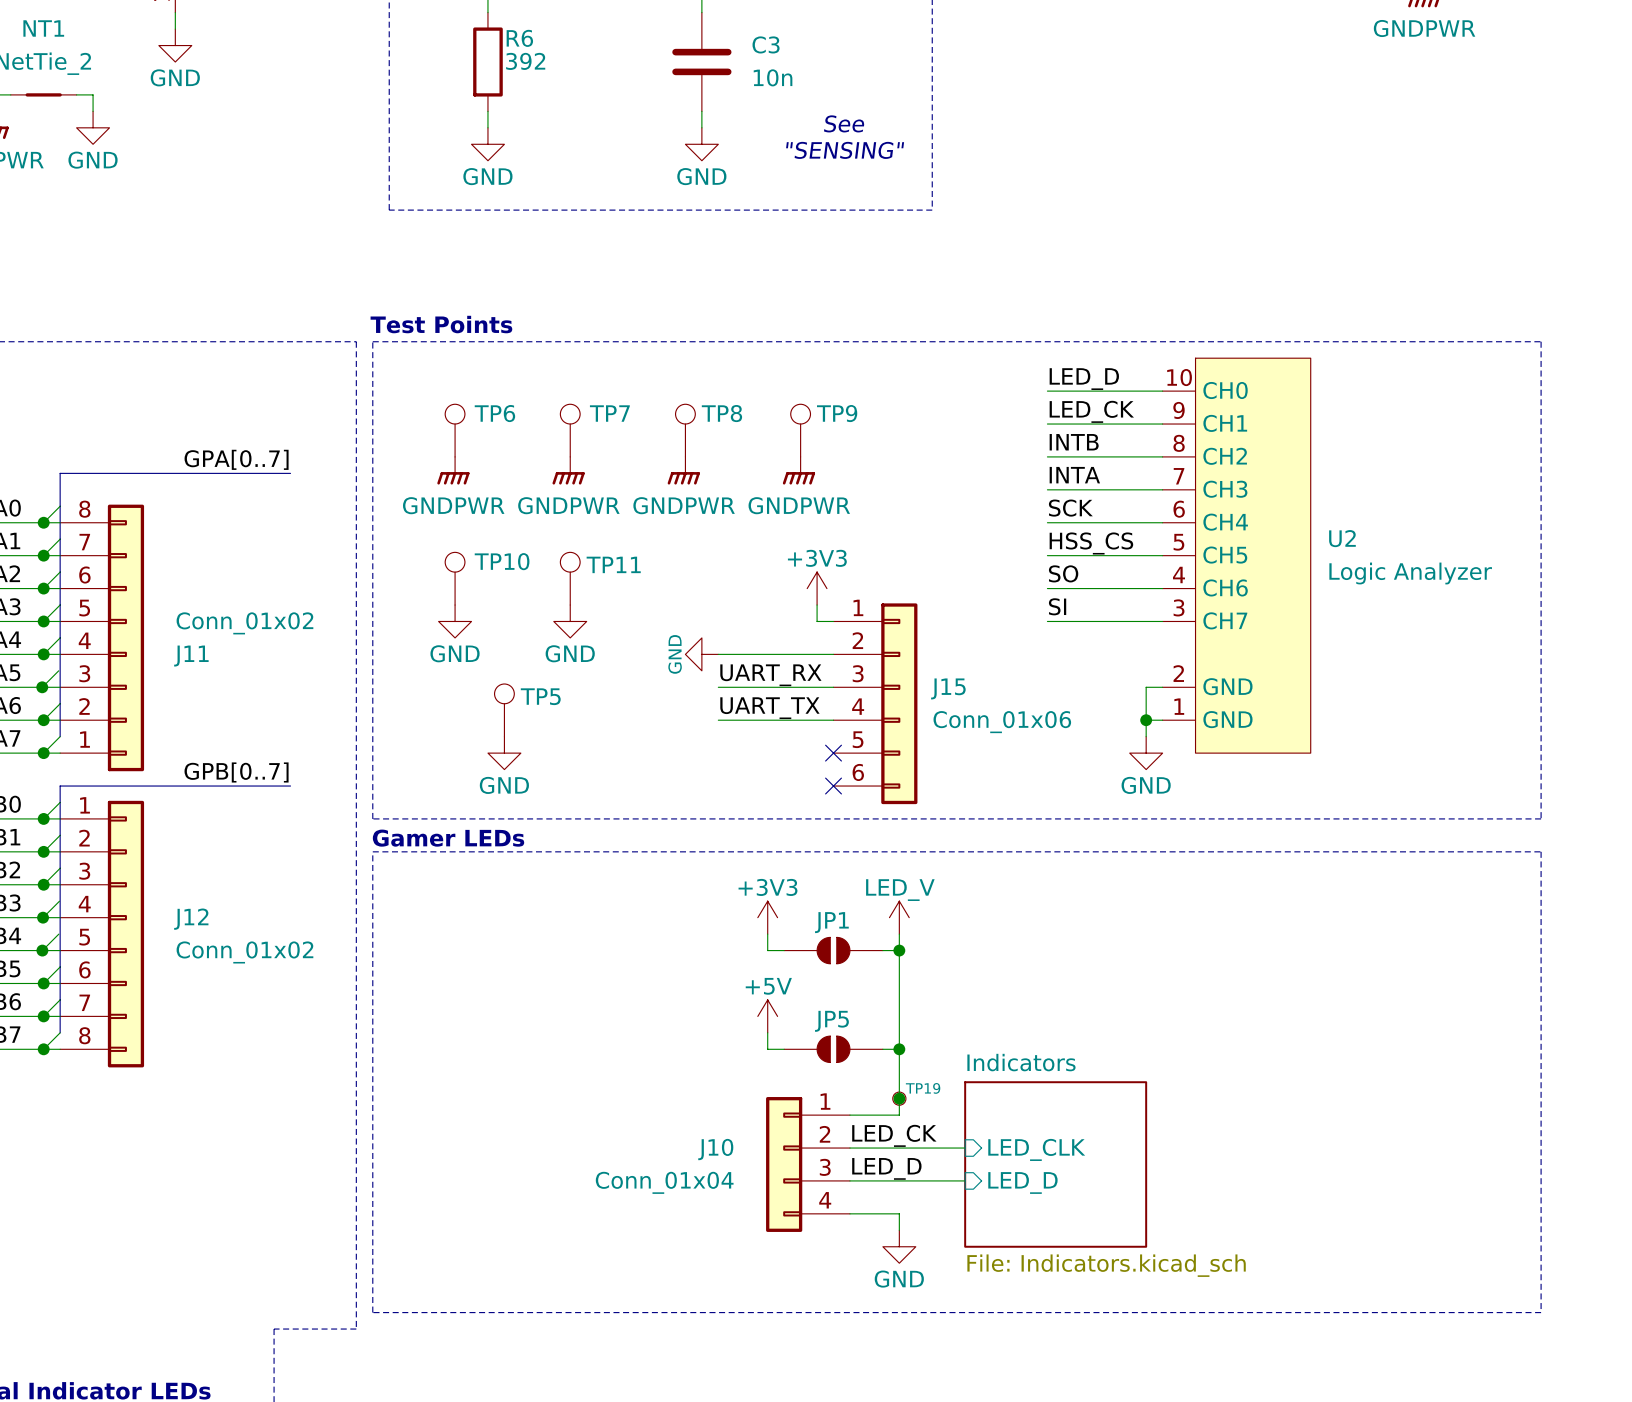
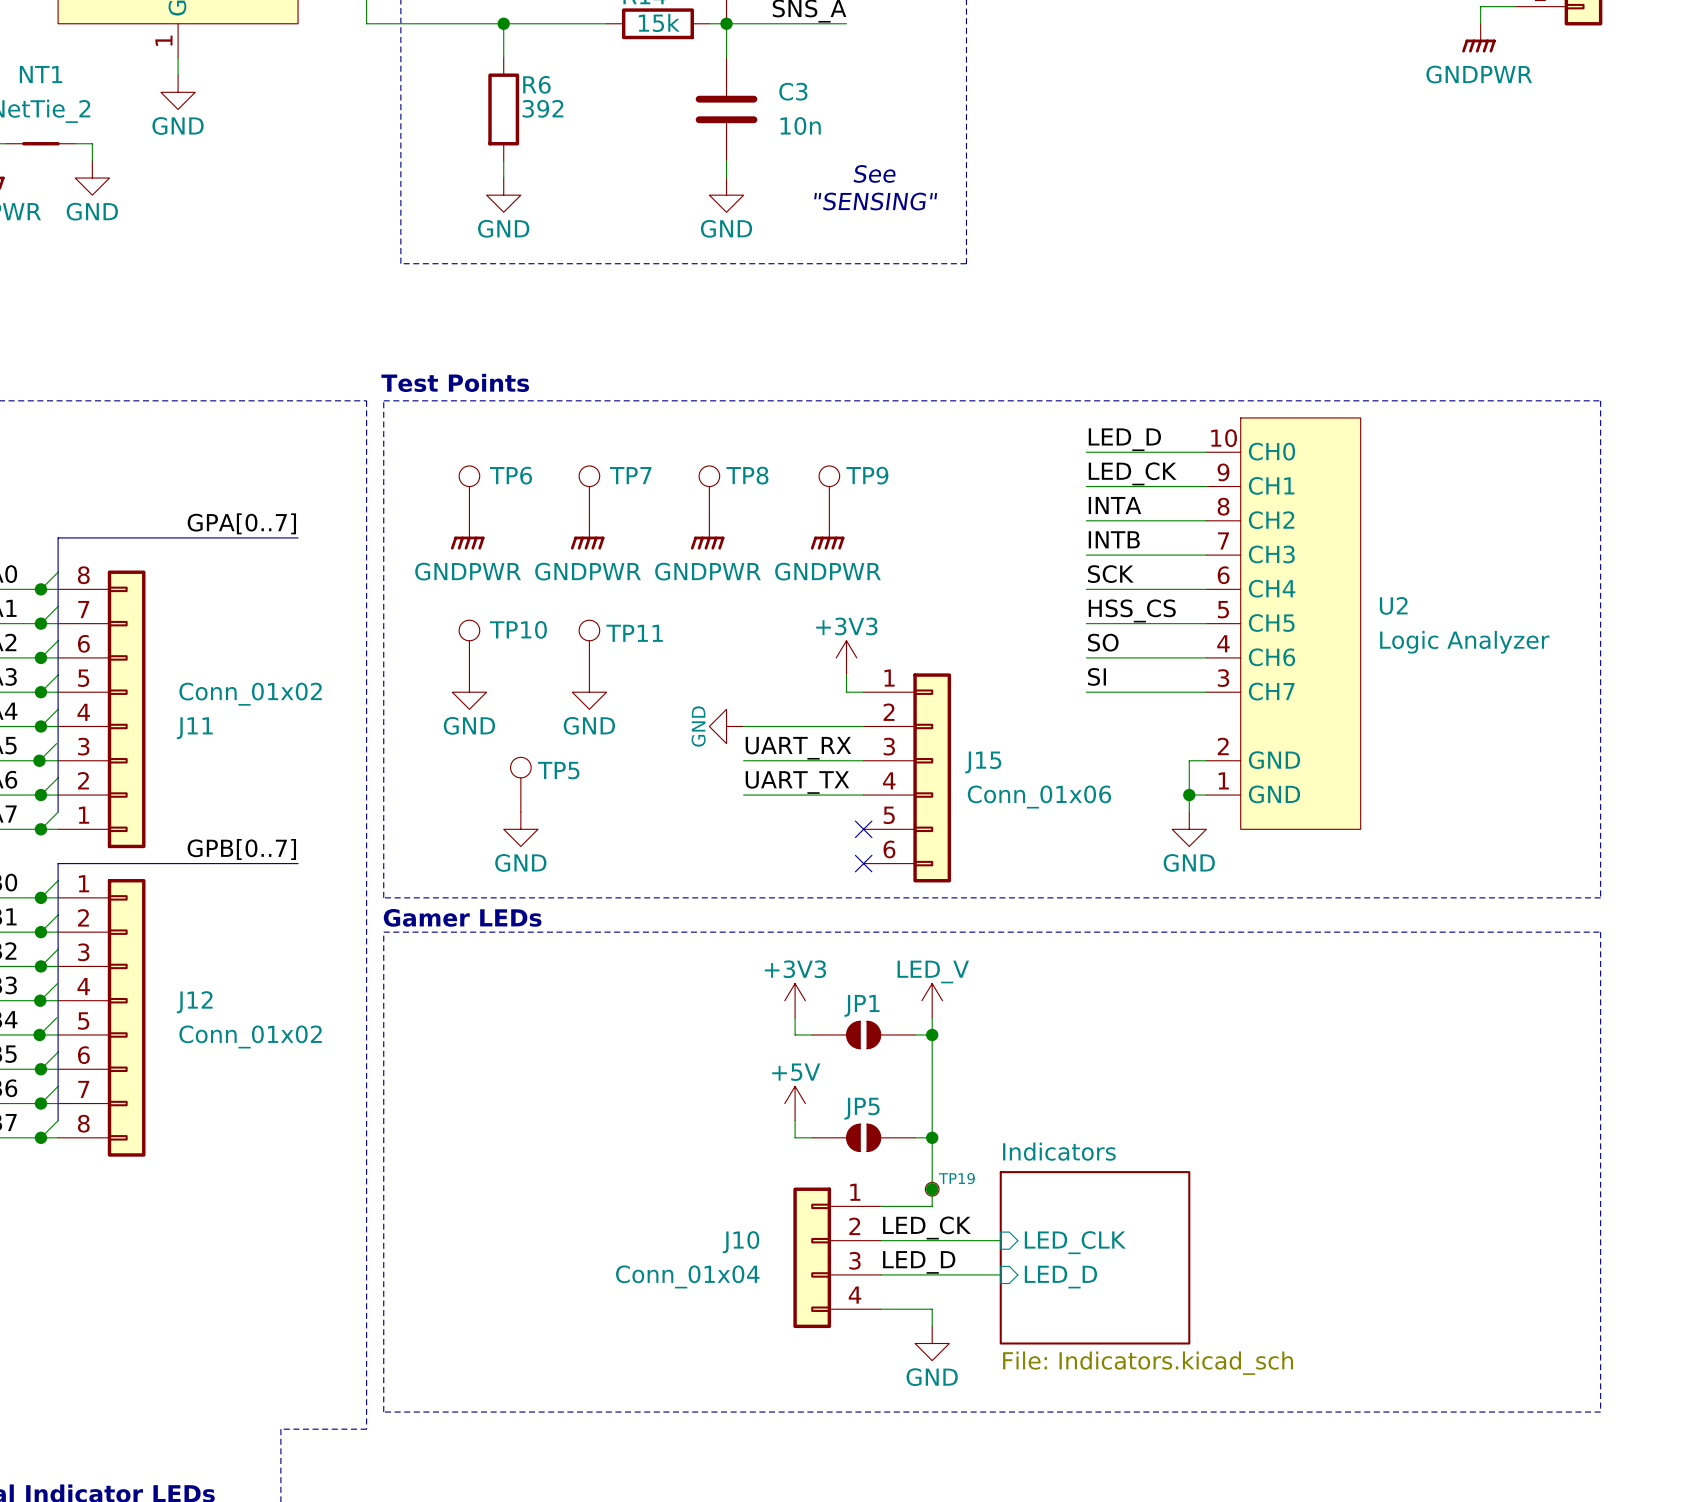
label: INTB (1074, 442) -> INTA (1114, 505)
label: INTA (1074, 475) -> INTB (1114, 539)

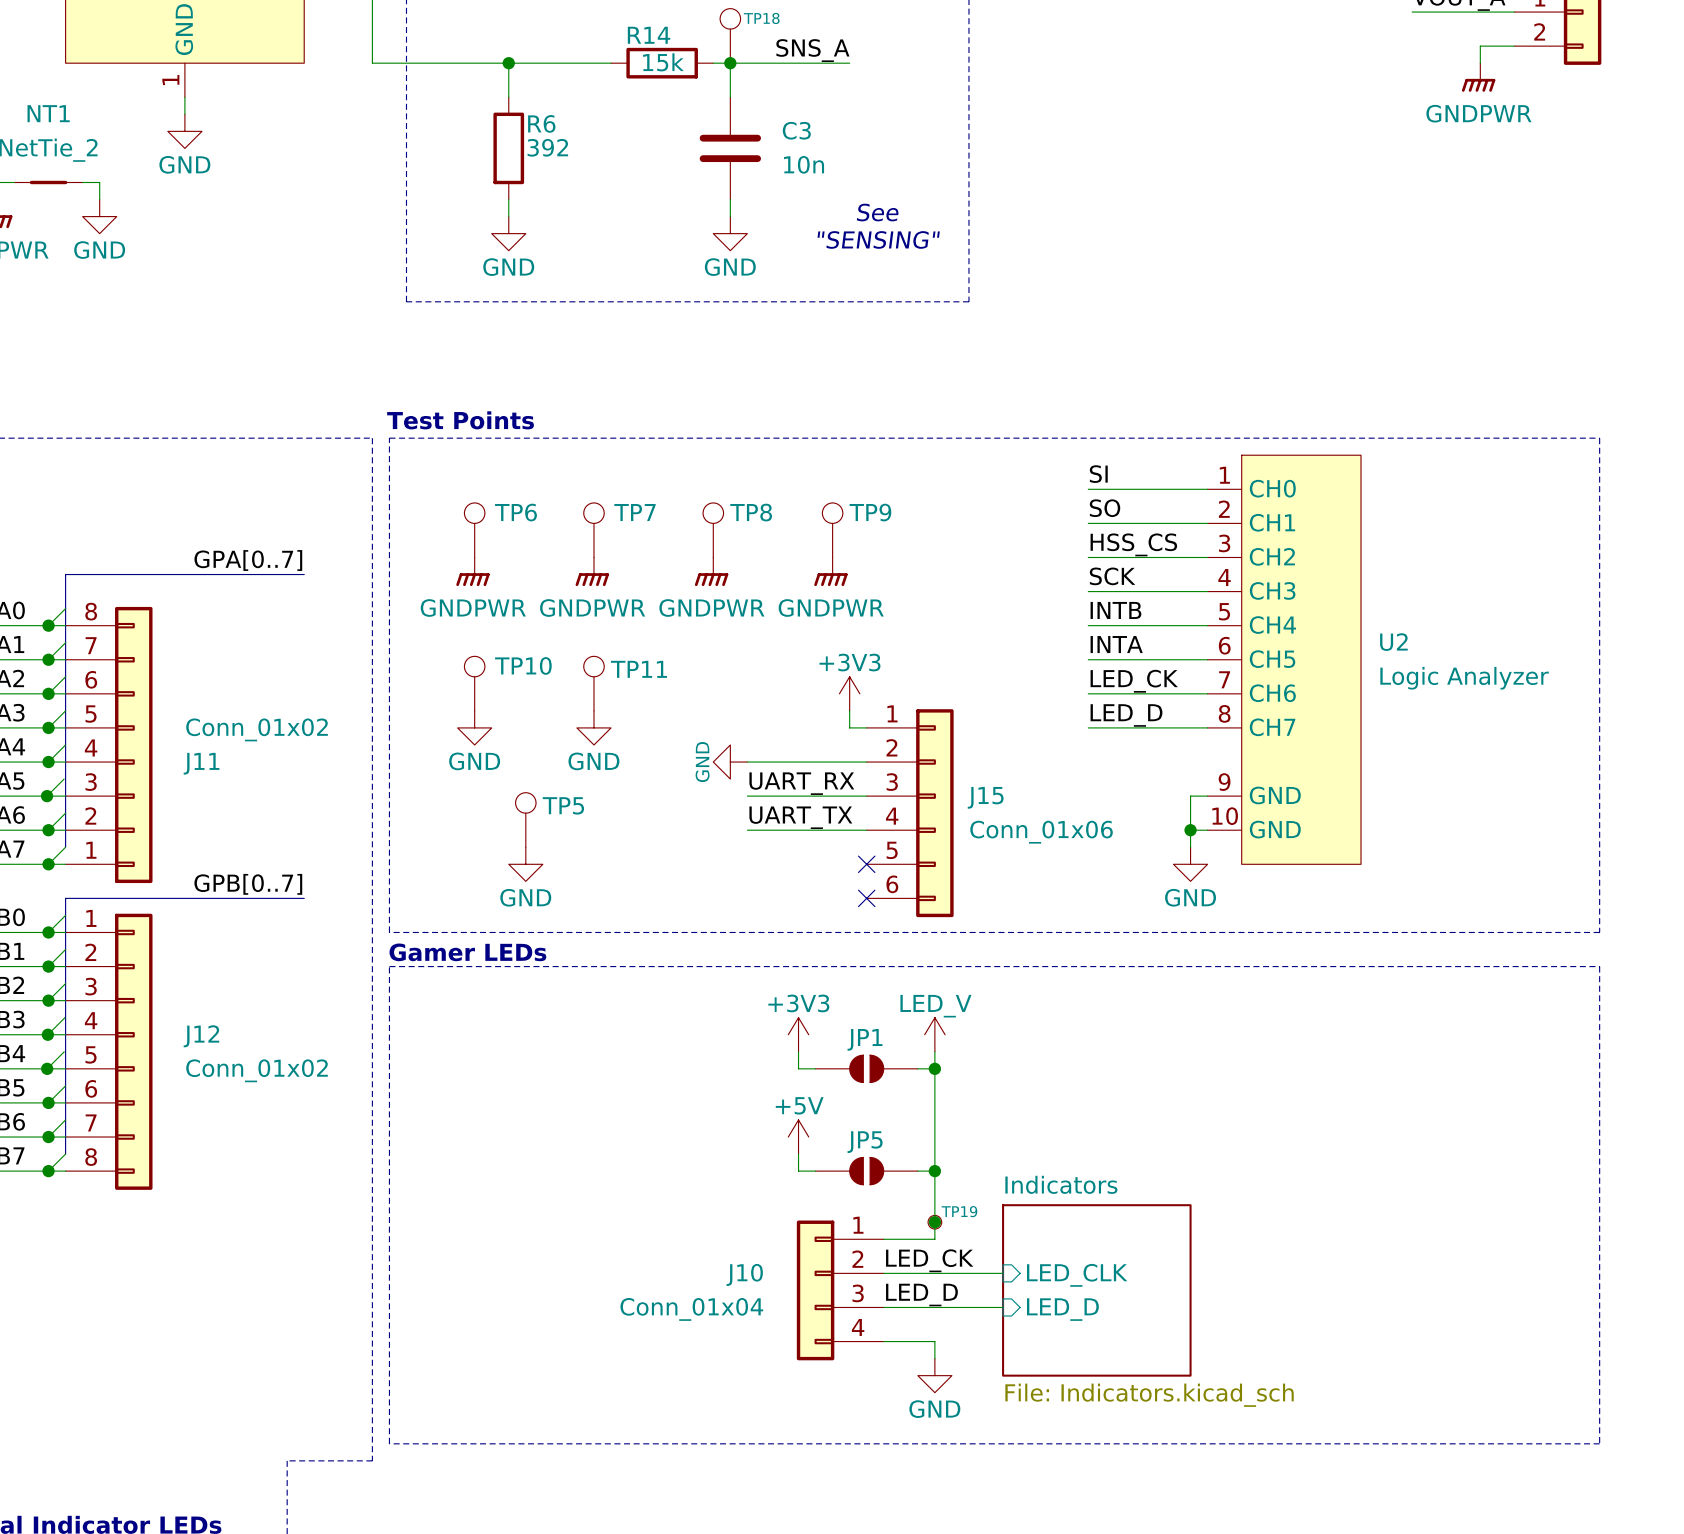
U2 symbol: [1206, 417, 1361, 830] -> [1207, 455, 1362, 865]
label: LED_D (1124, 439) -> SI (1098, 474)
label: LED_CK (1132, 473) -> SO (1105, 508)
label: INTA (1114, 505) -> HSS_CS (1133, 544)
label: INTB (1114, 539) -> SCK (1112, 576)
label: SCK (1110, 574) -> INTB (1115, 610)
label: HSS_CS (1132, 610) -> INTA (1116, 644)
label: SO (1103, 642) -> LED_CK (1134, 681)
label: SI (1097, 676) -> LED_D (1126, 715)

